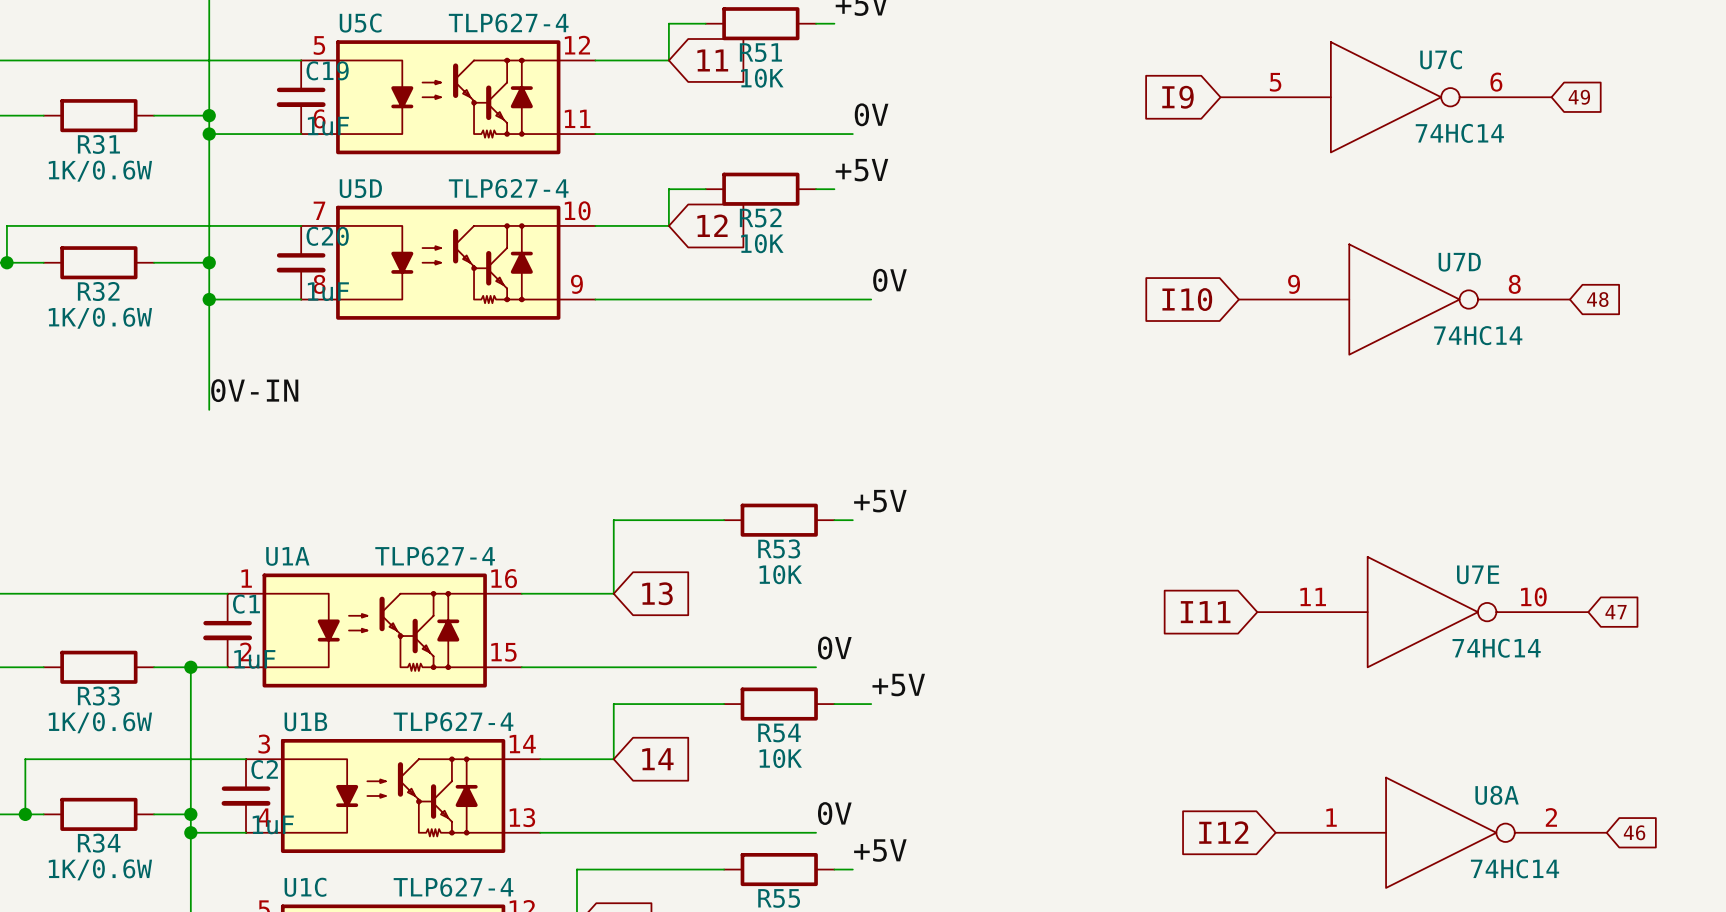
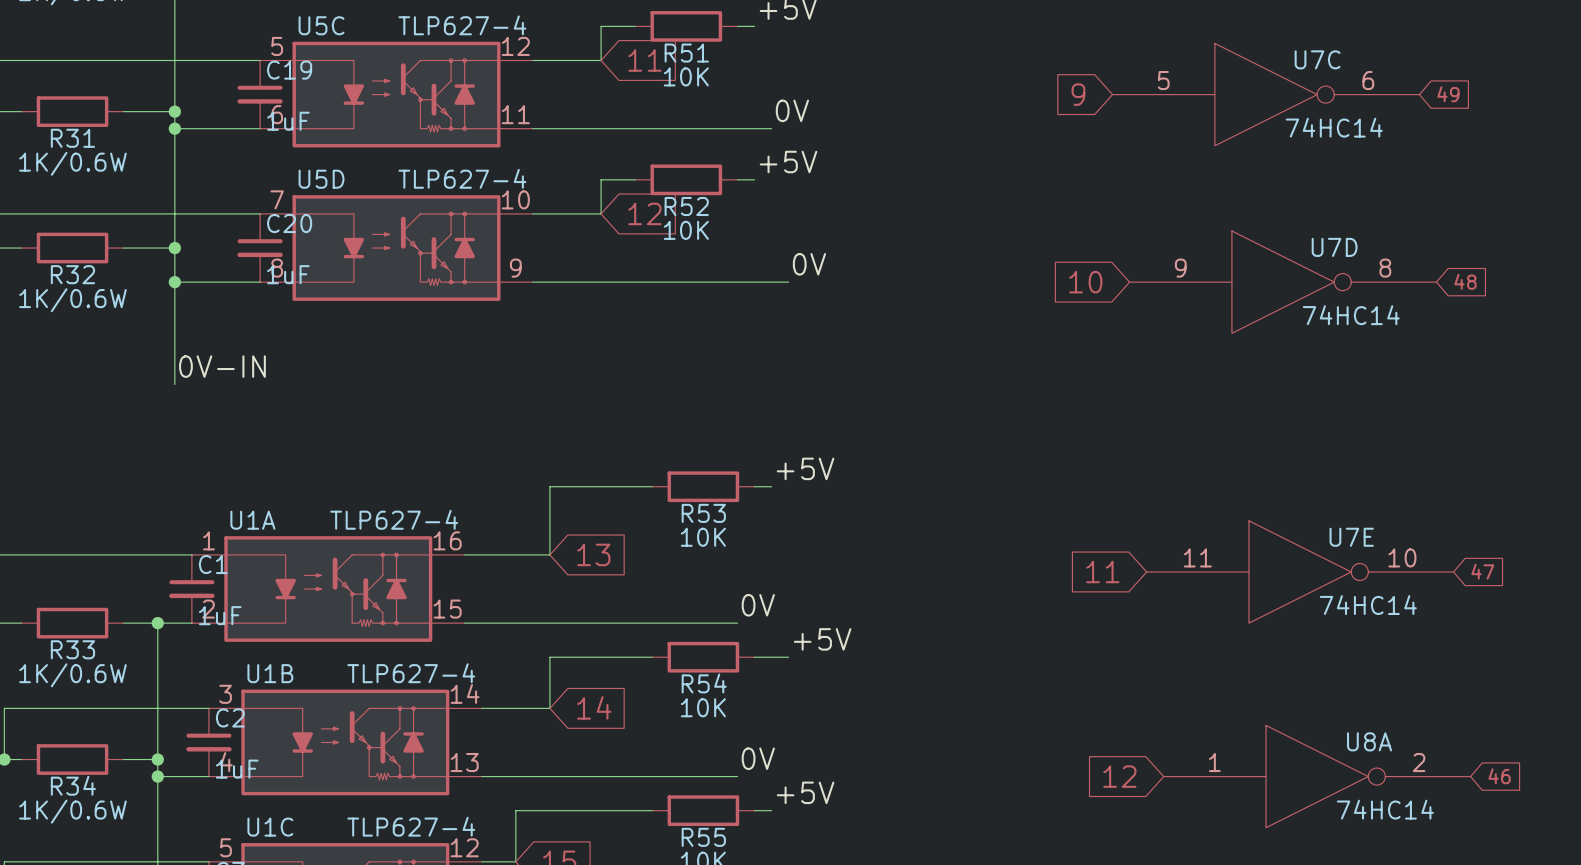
global label: I9 (1177, 97) -> 9 (1078, 94)
global label: I10 (1187, 299) -> 10 (1085, 282)
global label: I11 (1205, 612) -> 11 (1102, 571)
global label: I12 (1223, 832) -> 12 (1119, 776)

